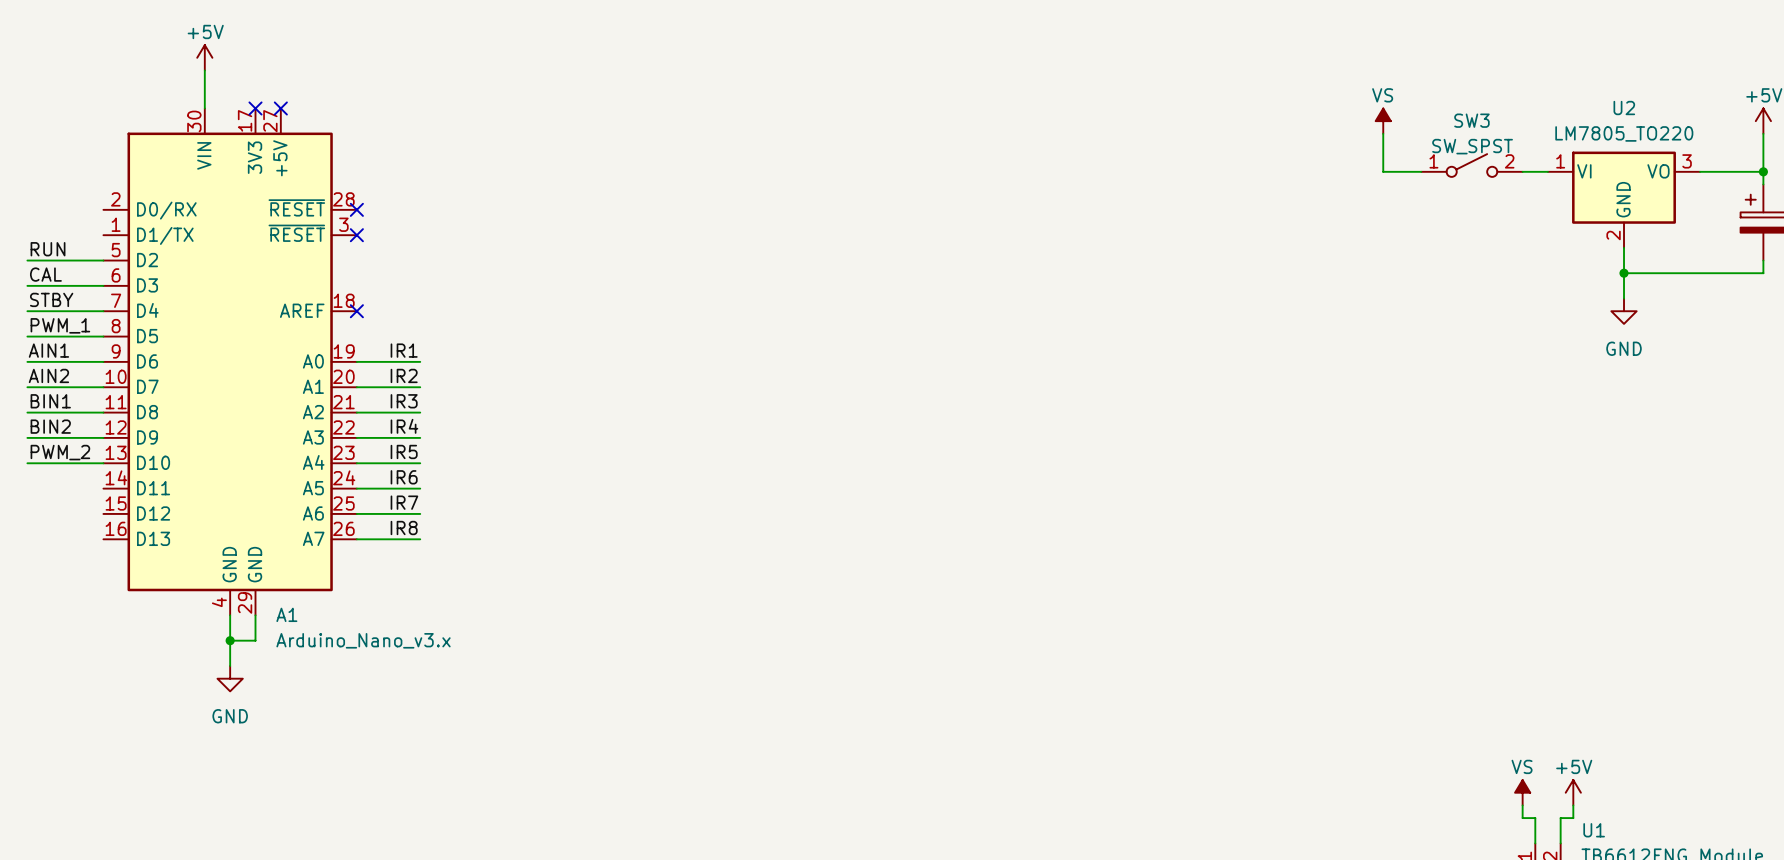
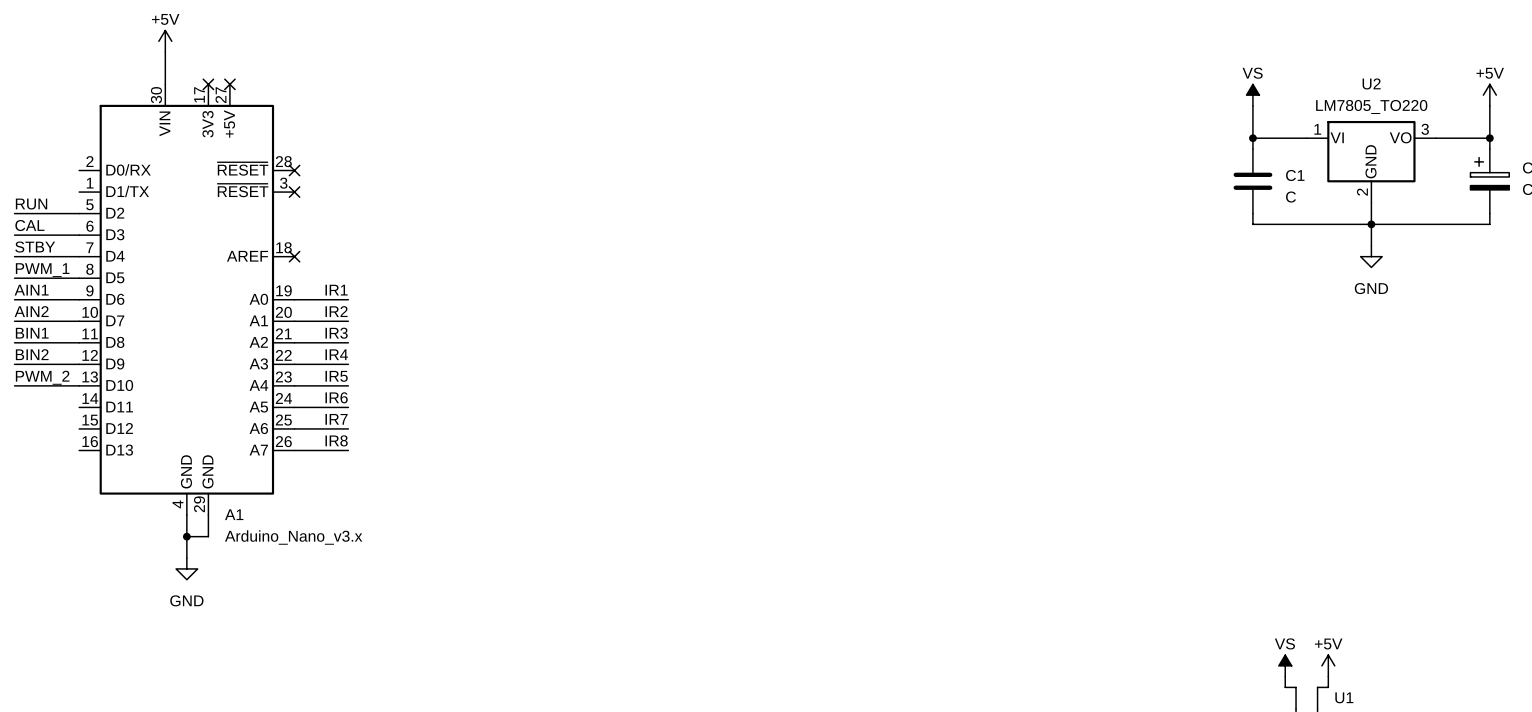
power symbol position: VS (1383, 121) -> VS (1252, 95)
wire: (1383, 133) (1383, 171) (1421, 171) -> none
wire: none -> (1252, 105) (1252, 148)
SW3: SW_SPST (1471, 165) -> none
junction: none -> (1252, 138)
C1: none -> C (1252, 181)
wire: none -> (1252, 213) (1252, 224) (1371, 224)

